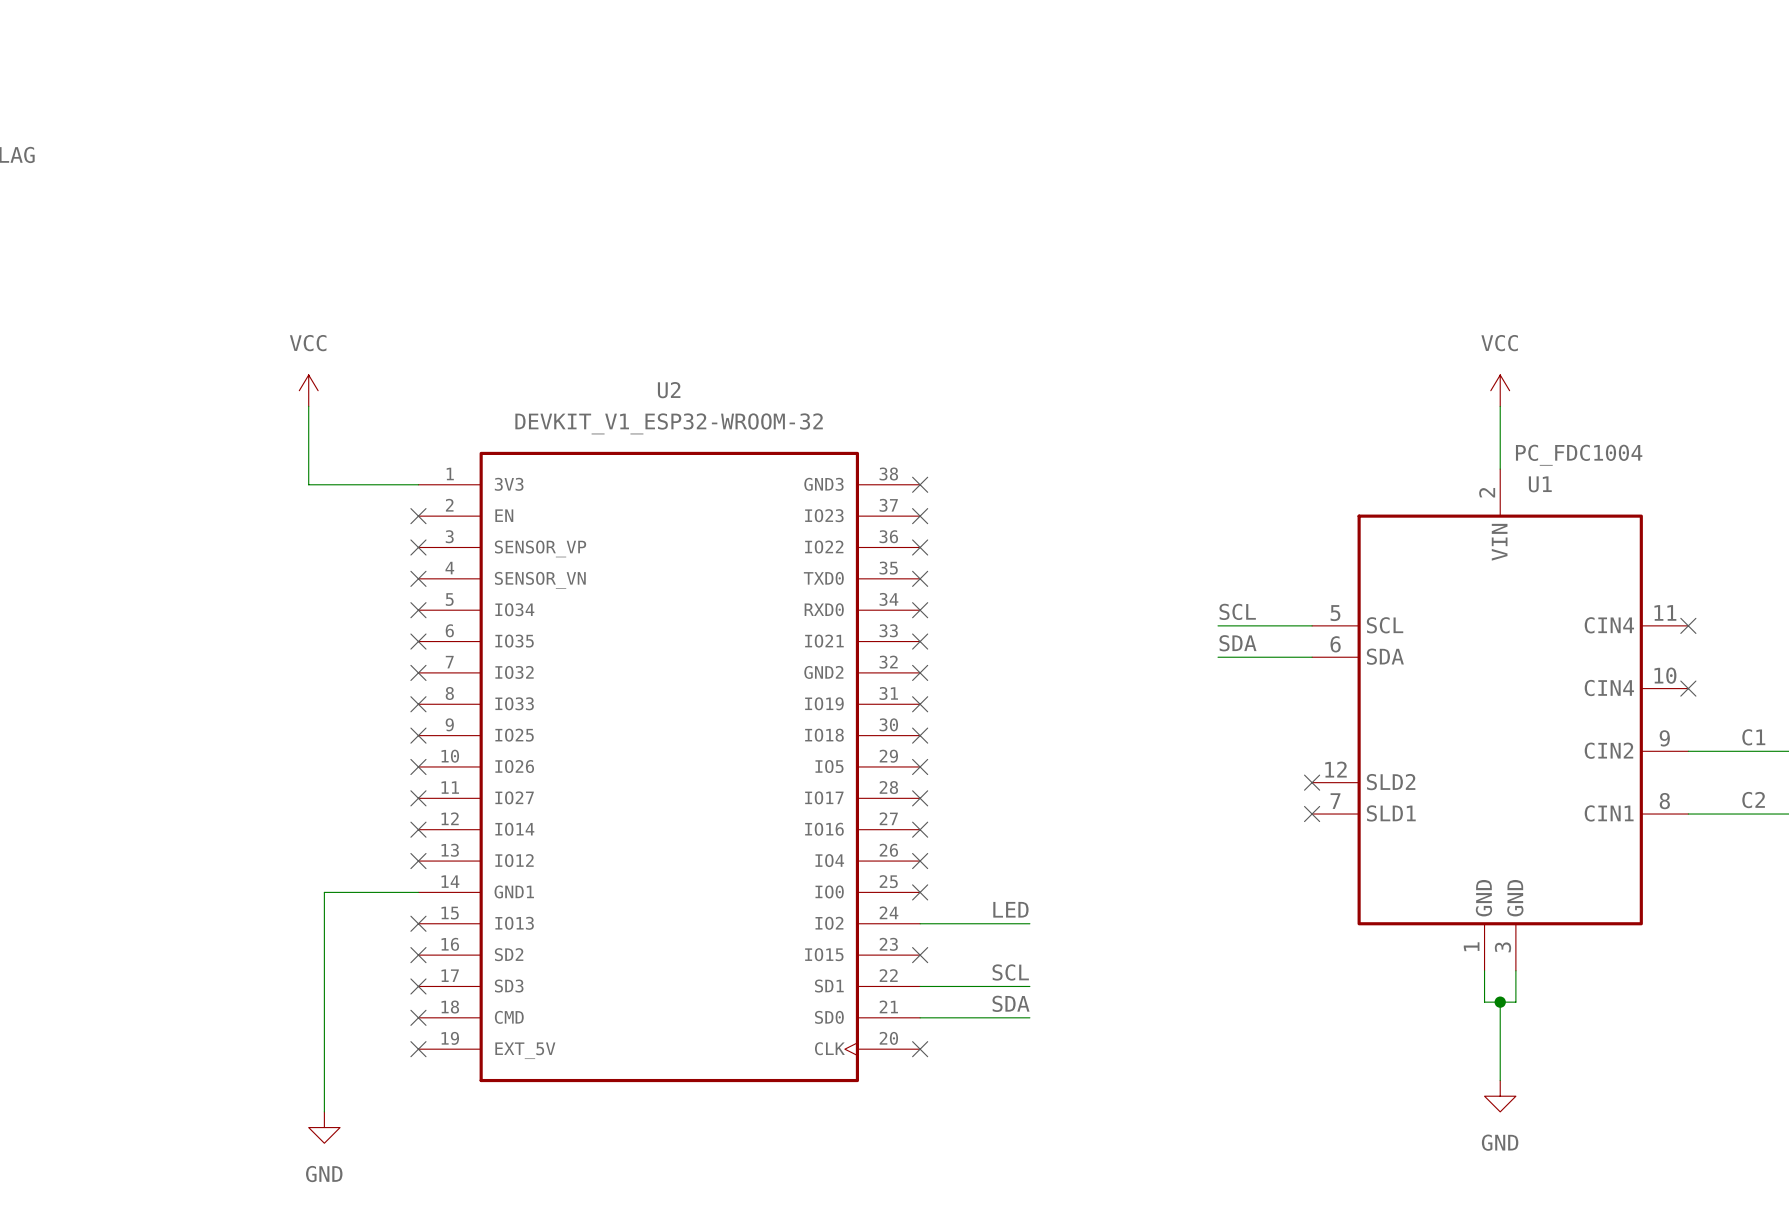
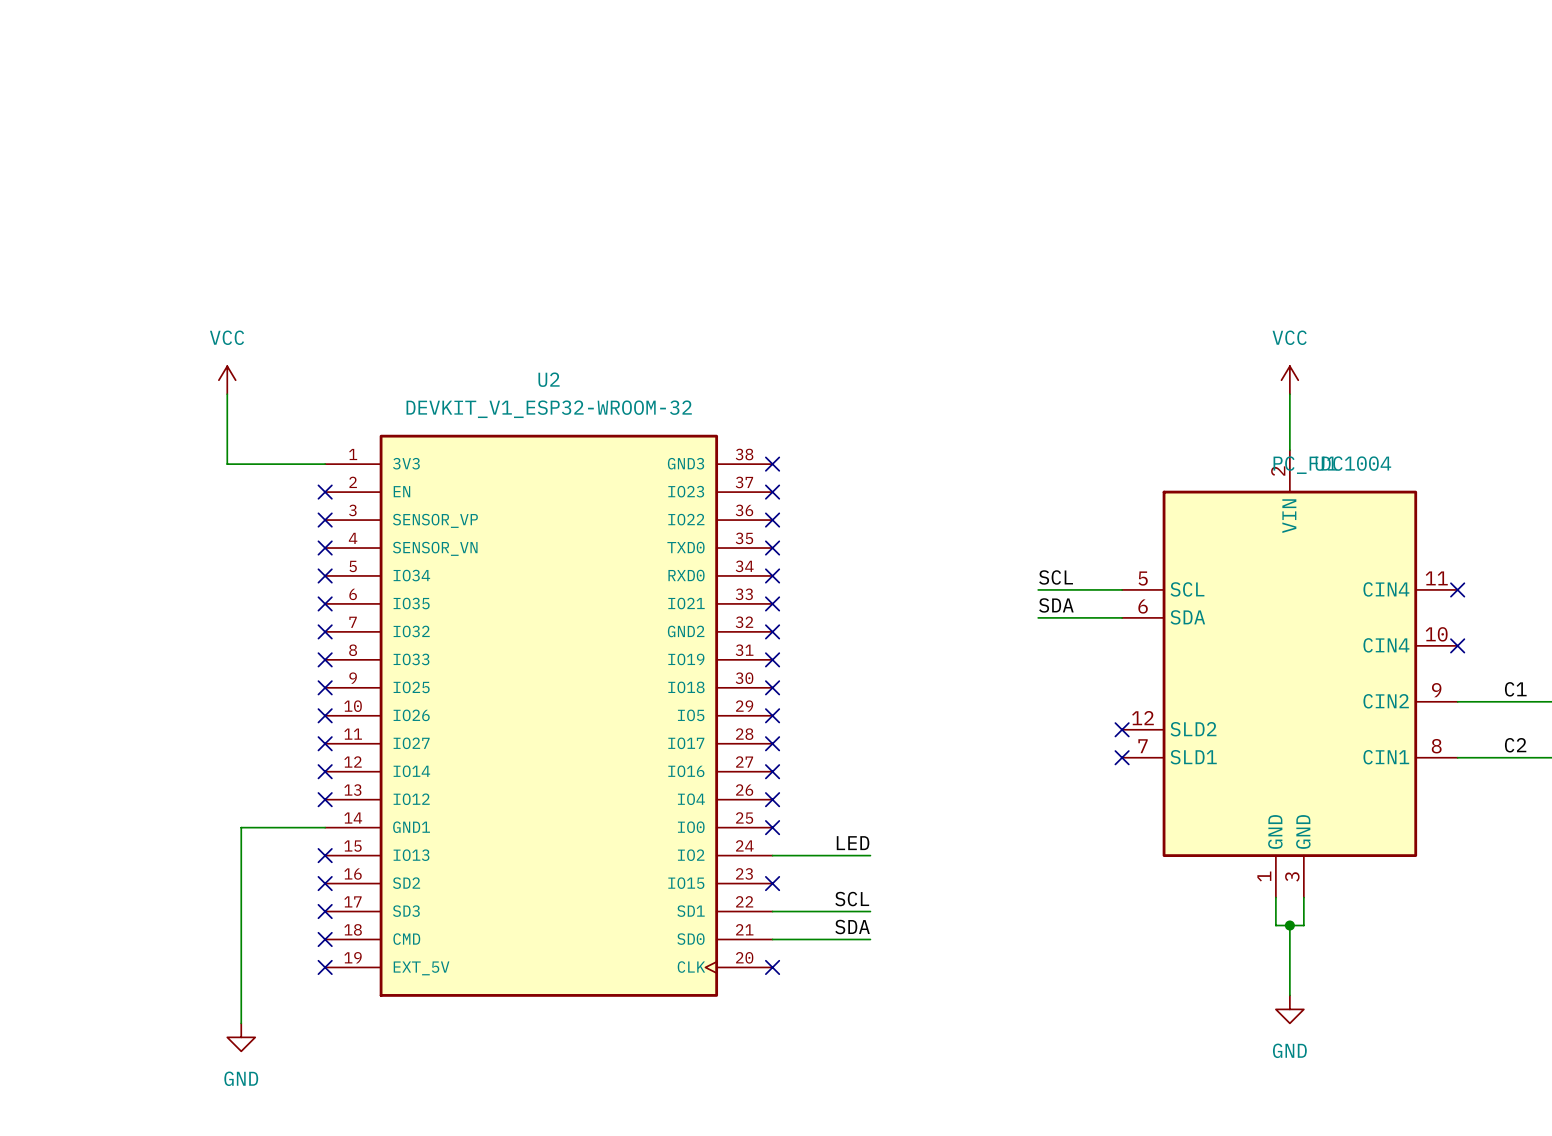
U1 value position: PC_FDC1004 (1579, 455) -> PC_FDC1004 (1332, 465)

